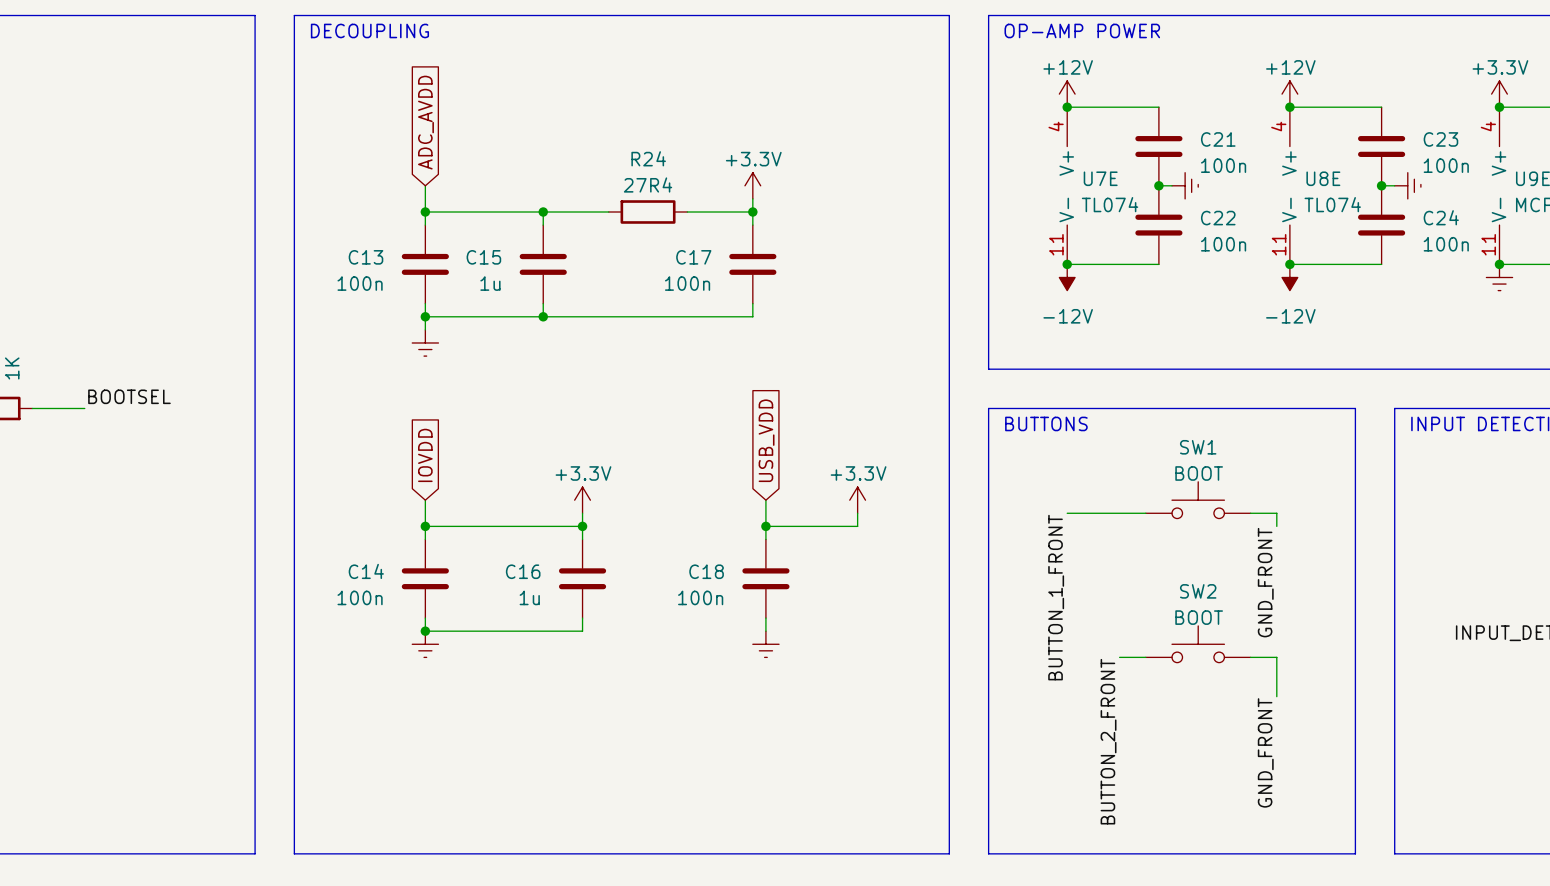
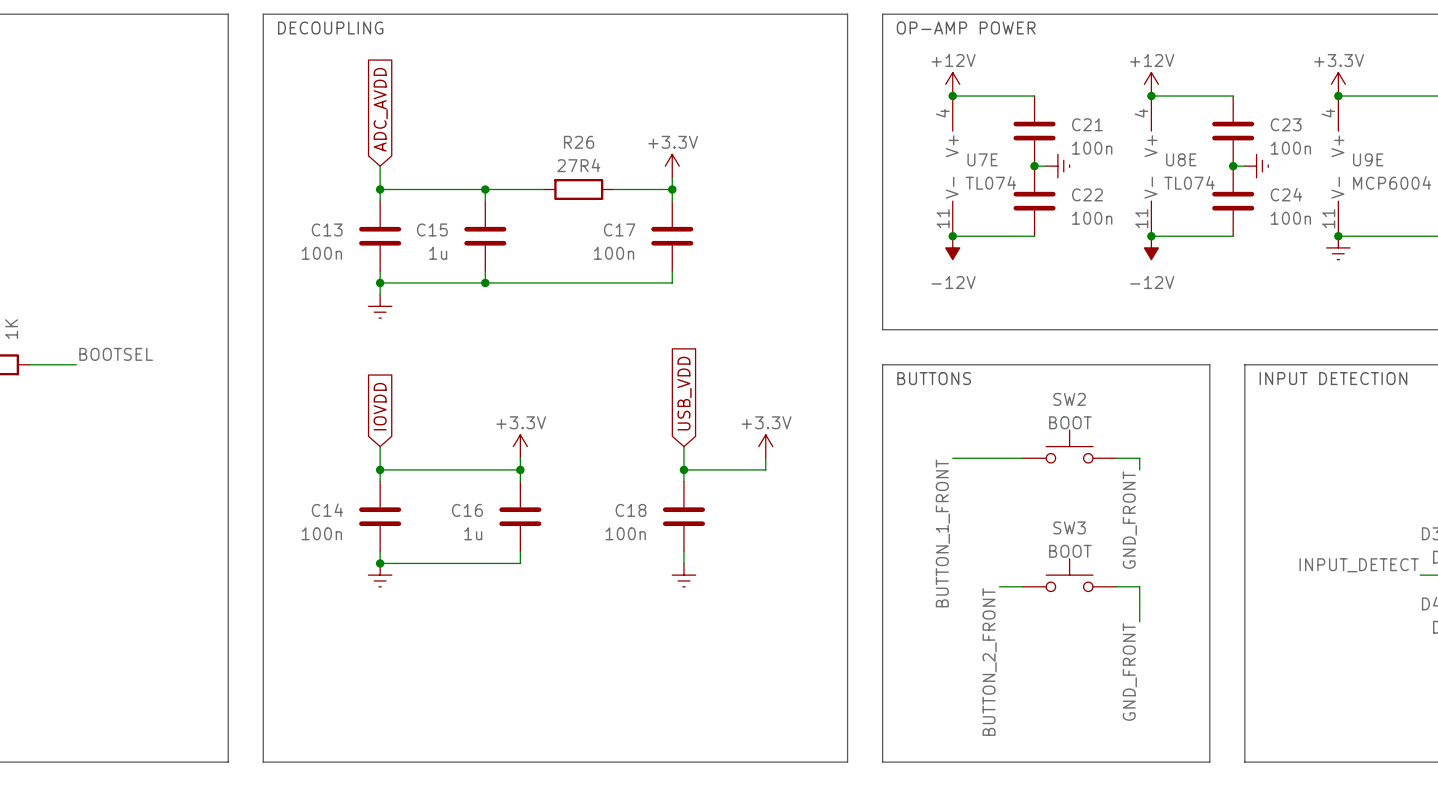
R24 name: R24 (648, 158) -> R26 (579, 142)
SW1 name: SW1 (1198, 447) -> SW2 (1069, 399)
SW2 name: SW2 (1198, 591) -> SW3 (1069, 527)

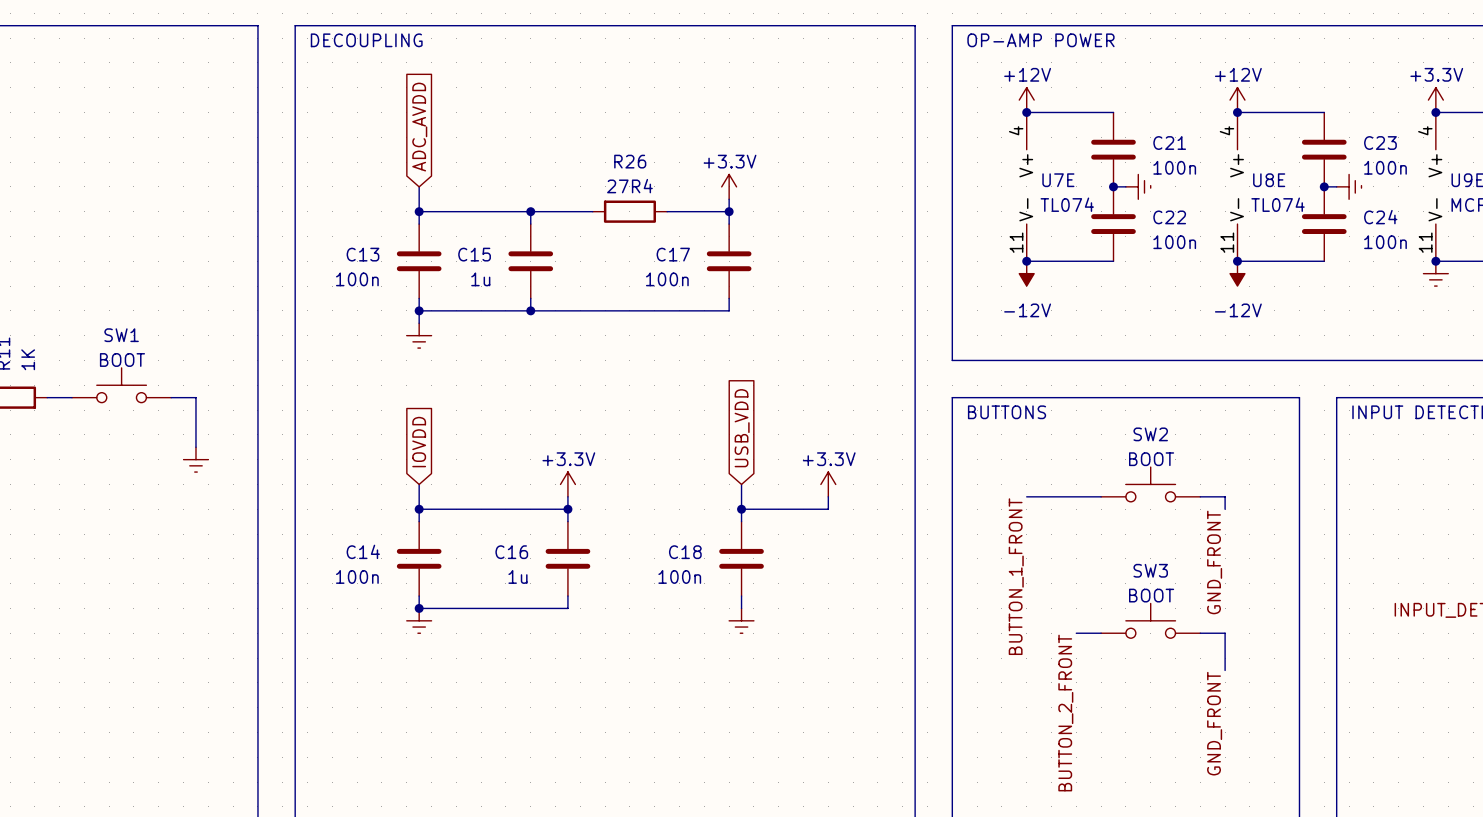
SW1: none -> BOOT (121, 385)
label: BOOTSEL (116, 354) -> none
wire: none -> (171, 397) (195, 397) (195, 447)
power symbol: none -> (195, 459)

